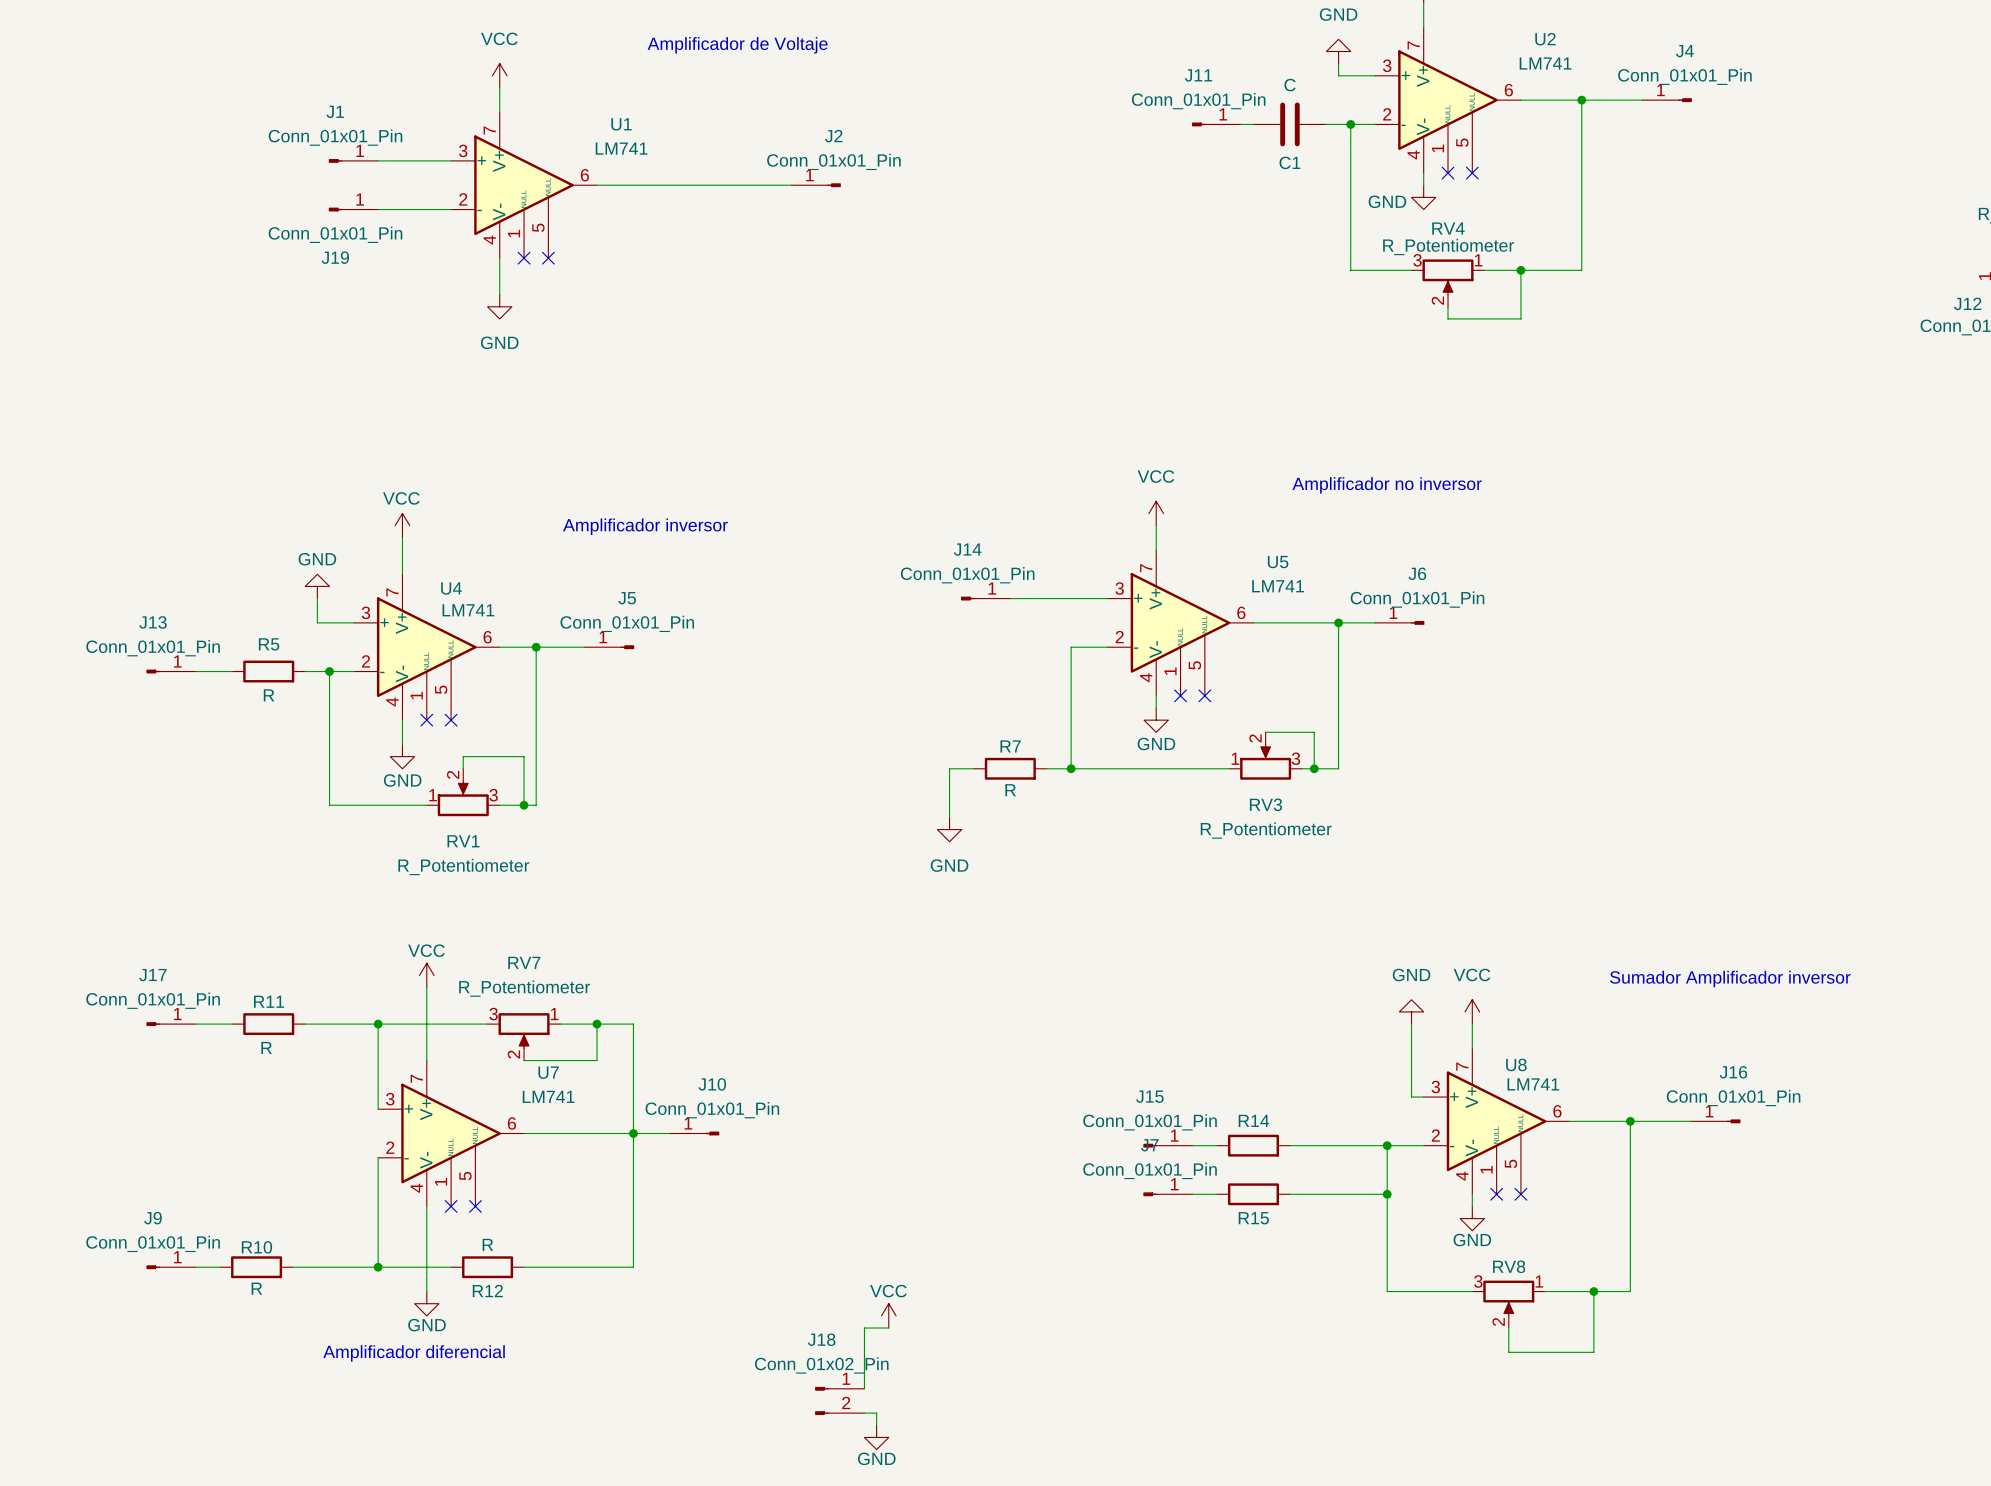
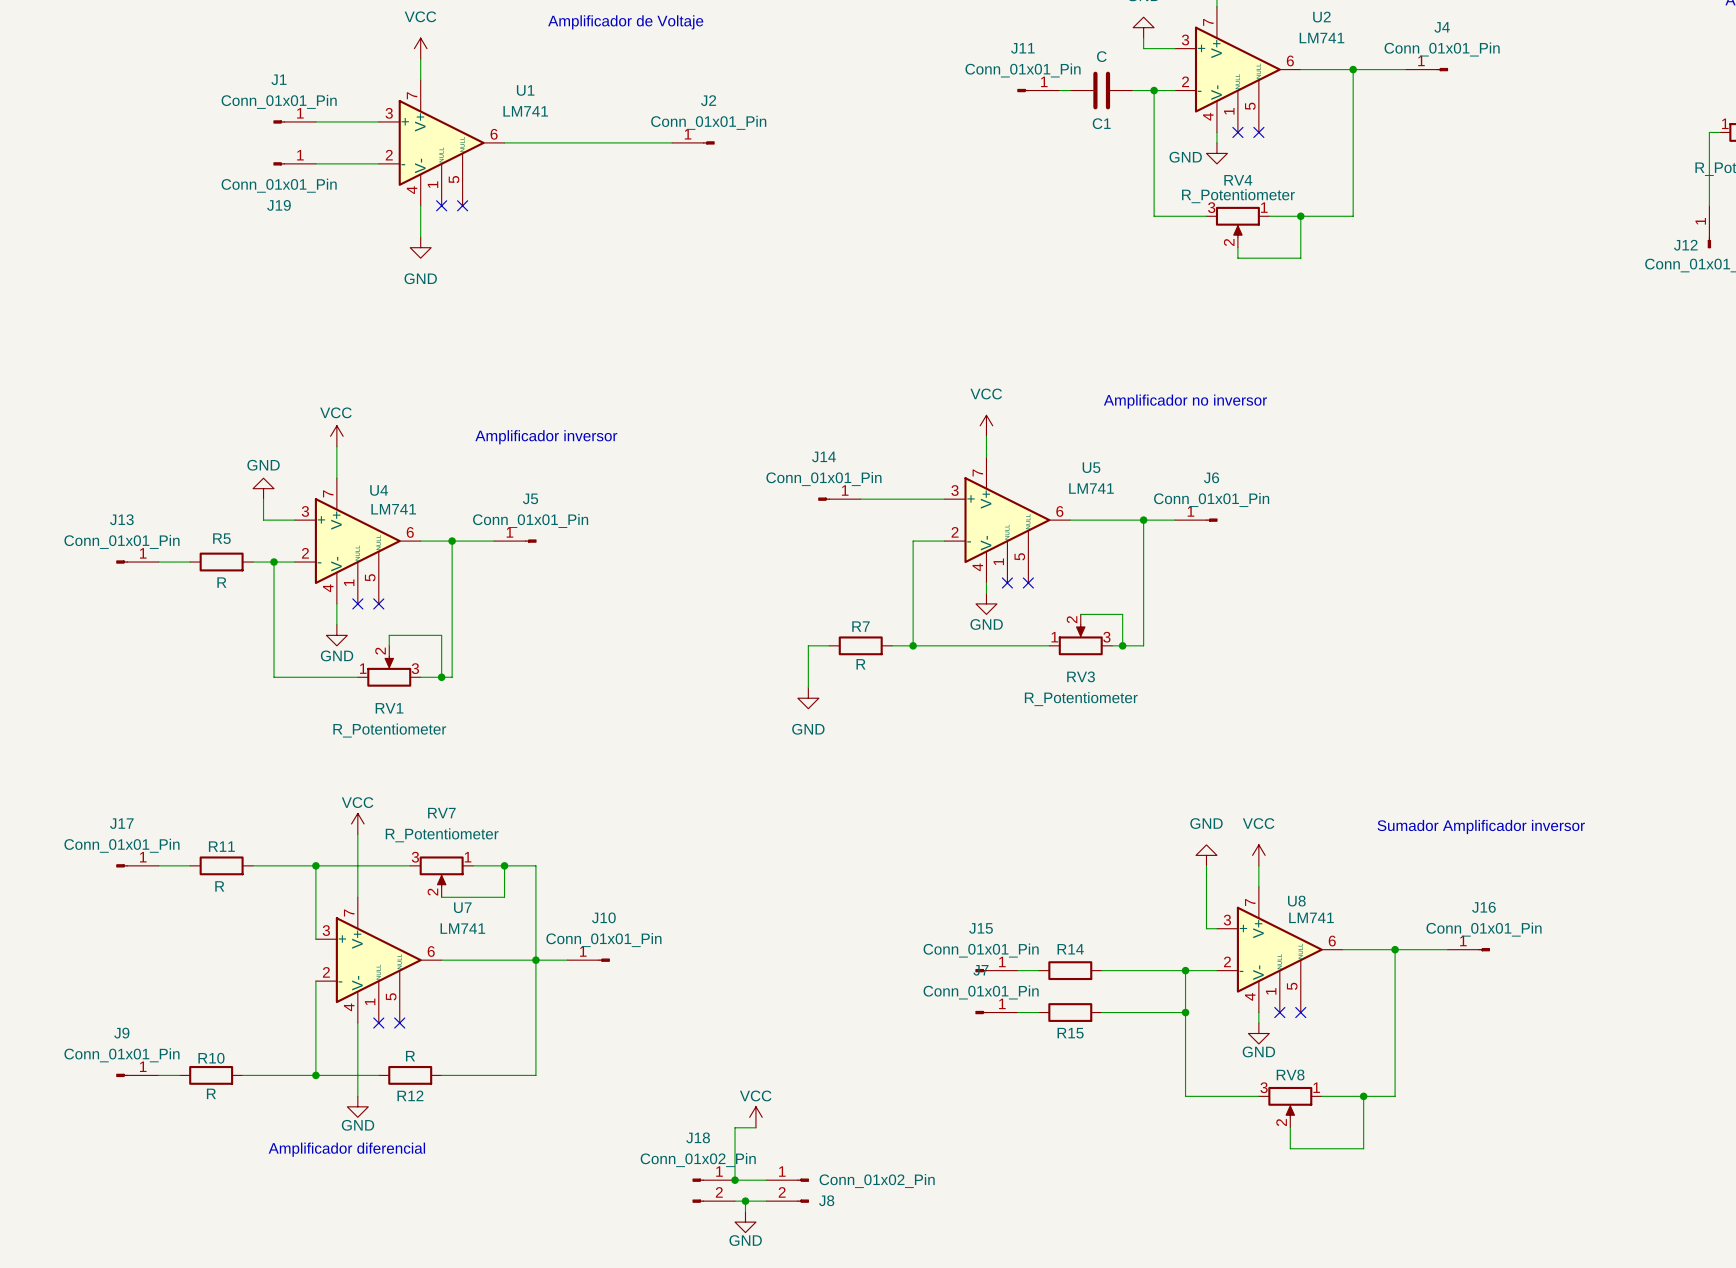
wire: none -> (735, 1180) (766, 1180)
junction: none -> (735, 1180)
J8: none -> Conn_01x02_Pin (787, 1190)
wire: none -> (745, 1201) (766, 1201)
junction: none -> (745, 1201)

